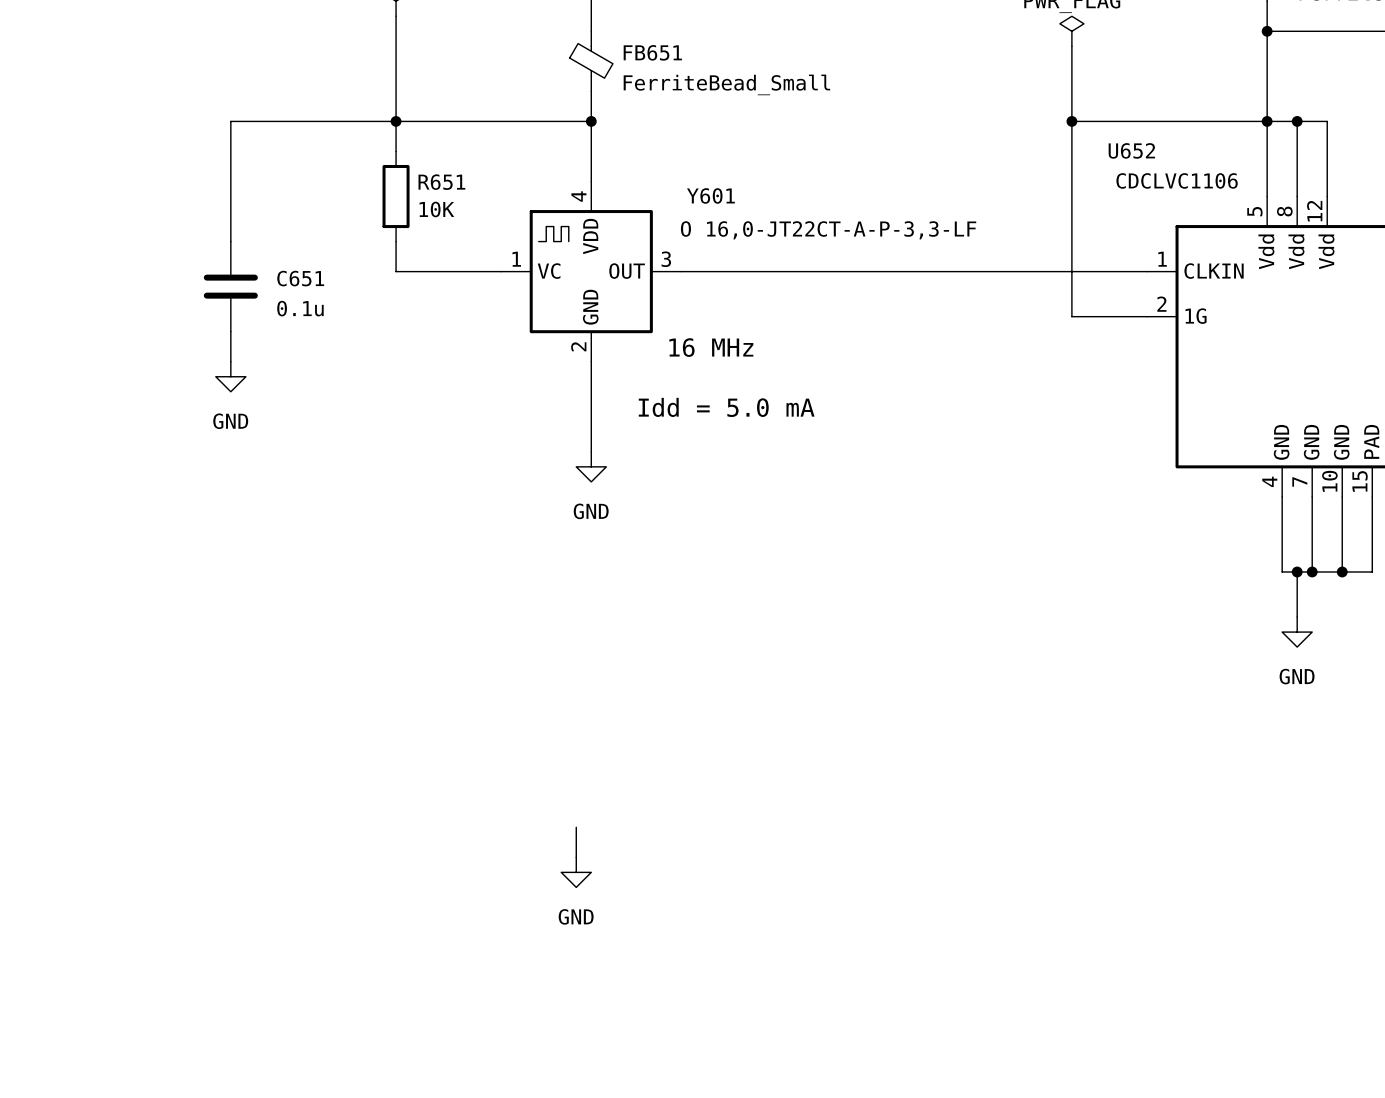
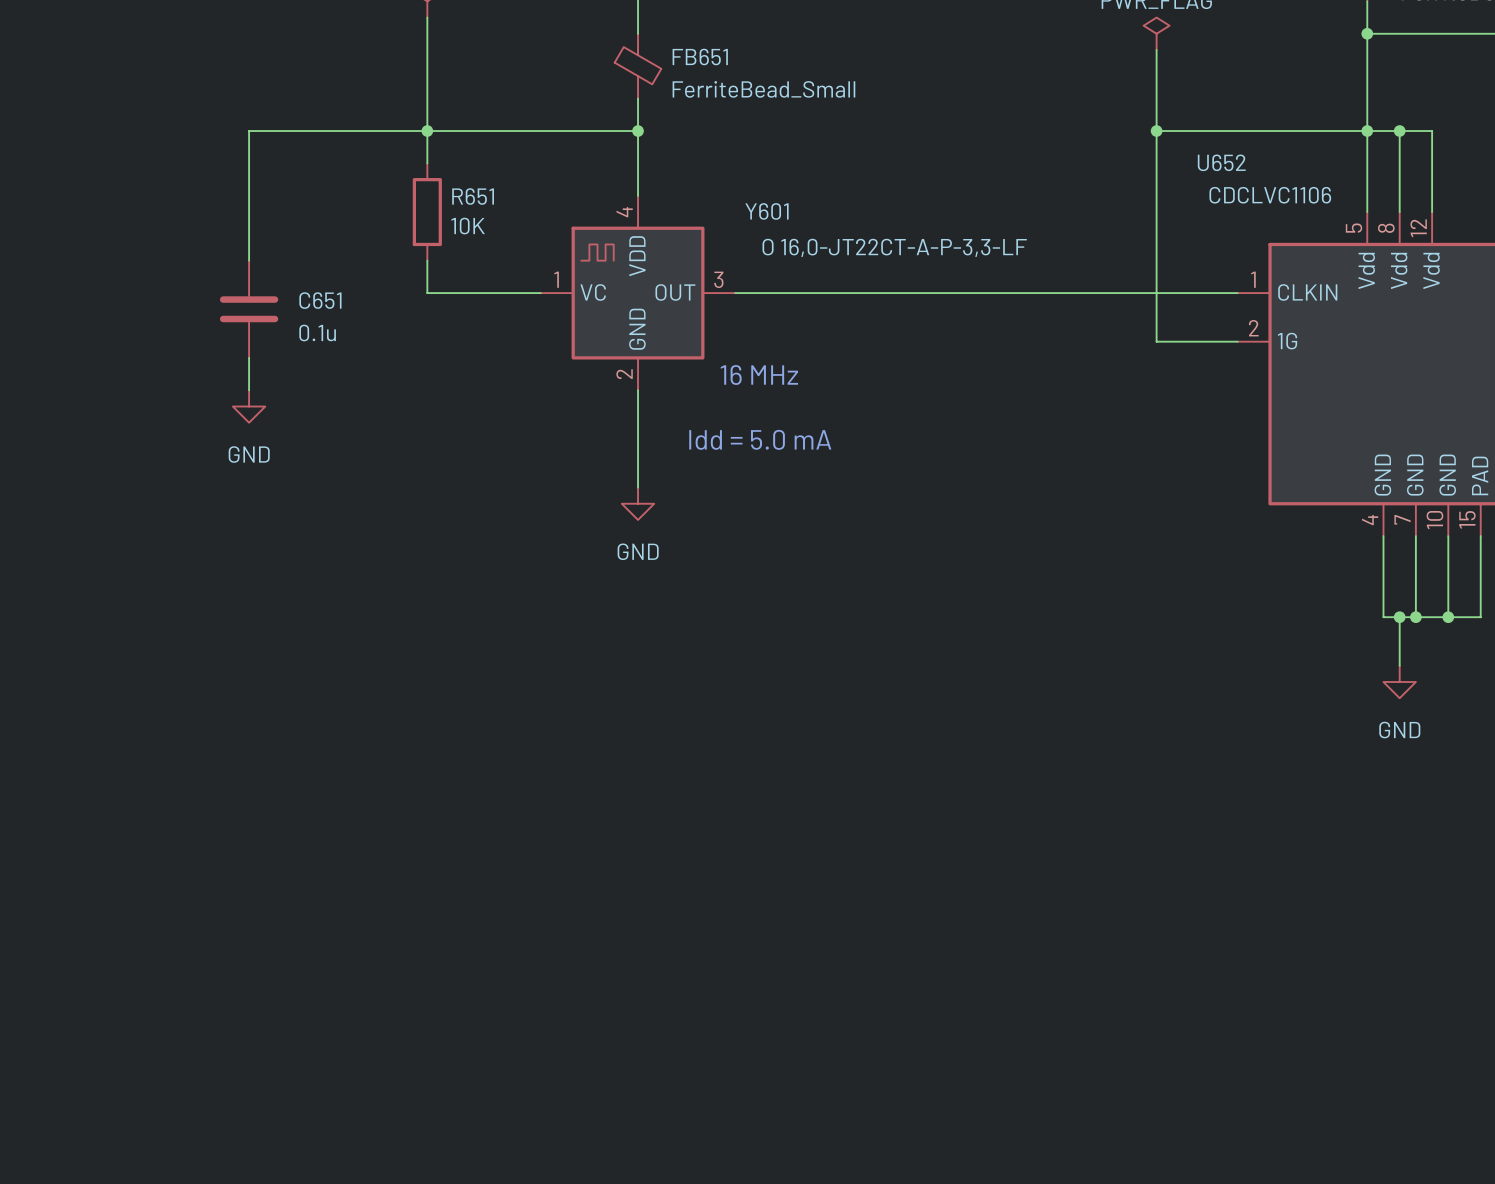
wire: (576, 827) (576, 857) -> none
power symbol: GND (576, 872) -> none

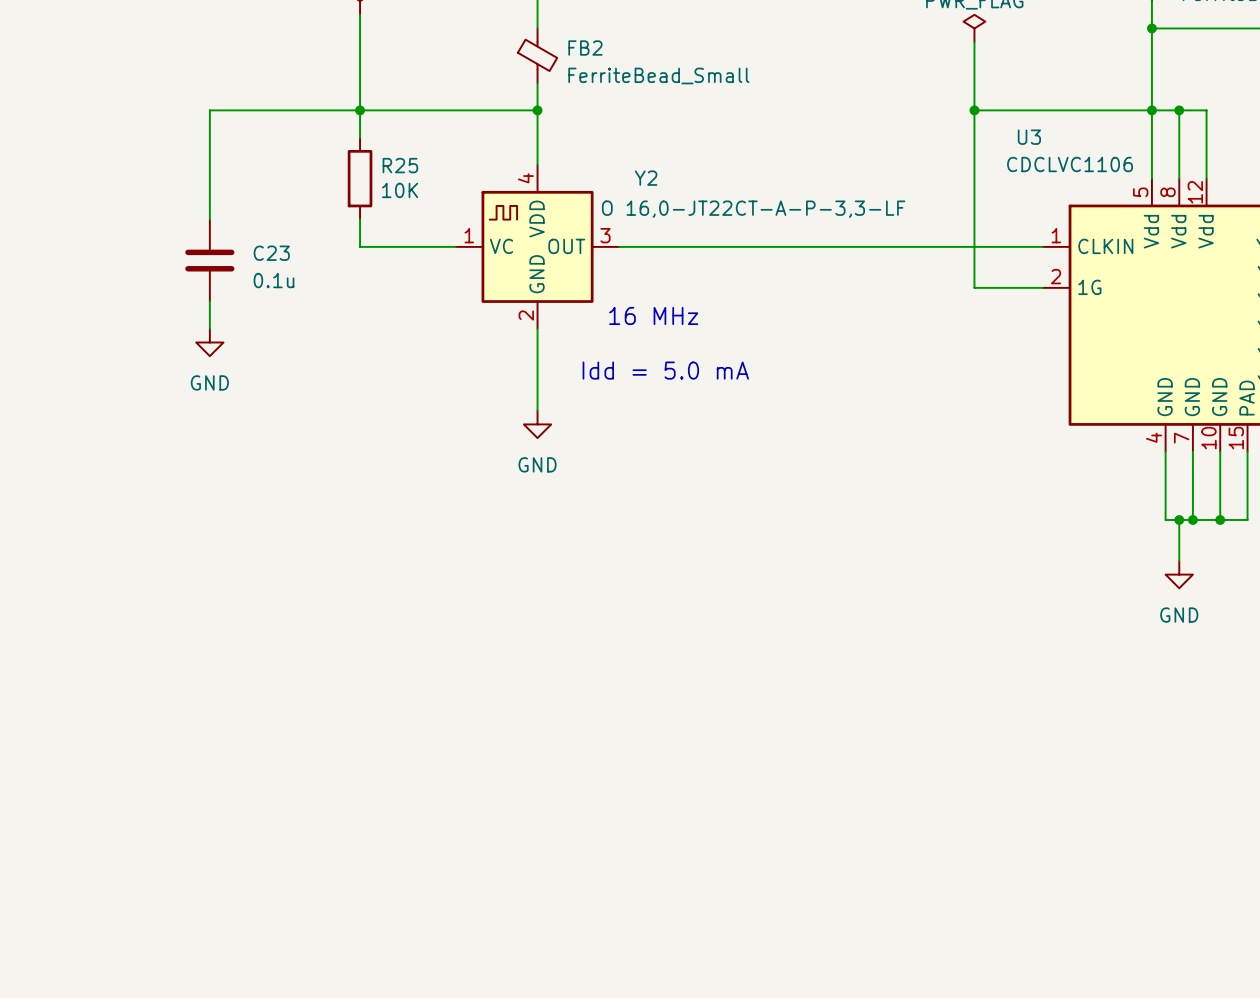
FB651 name: FB651 (700, 56) -> FB2 (585, 48)
U652 name: U652 (1221, 162) -> U3 (1029, 137)
R651 name: R651 (473, 196) -> R25 (400, 165)
Y601 name: Y601 (767, 211) -> Y2 (646, 178)
C651 name: C651 (320, 300) -> C23 (271, 253)

